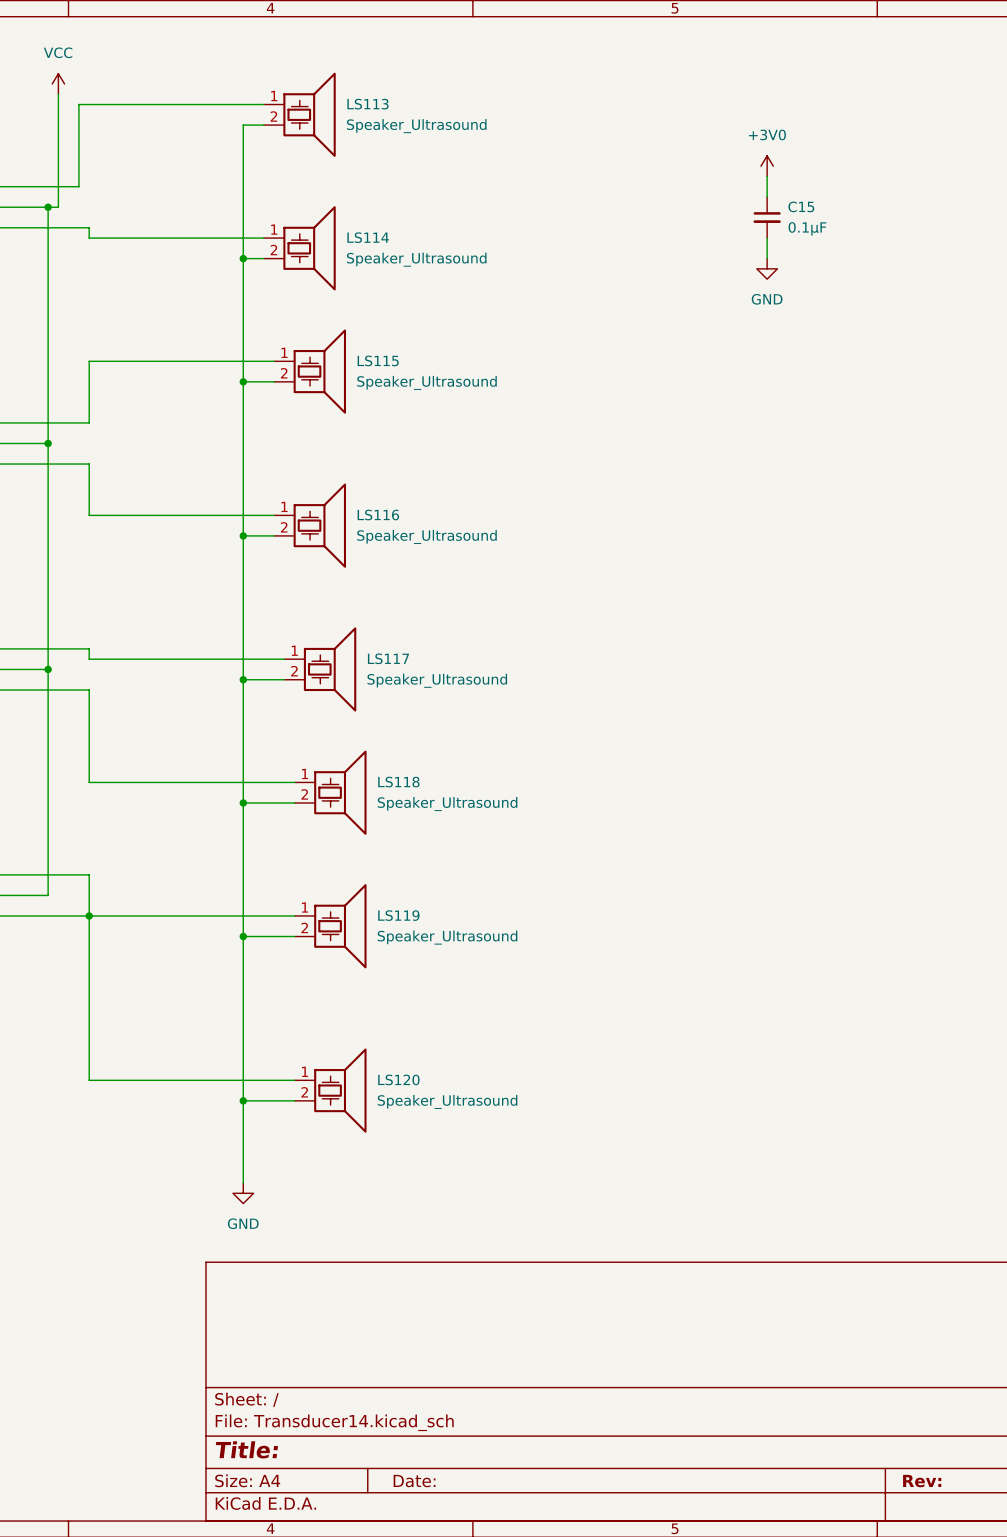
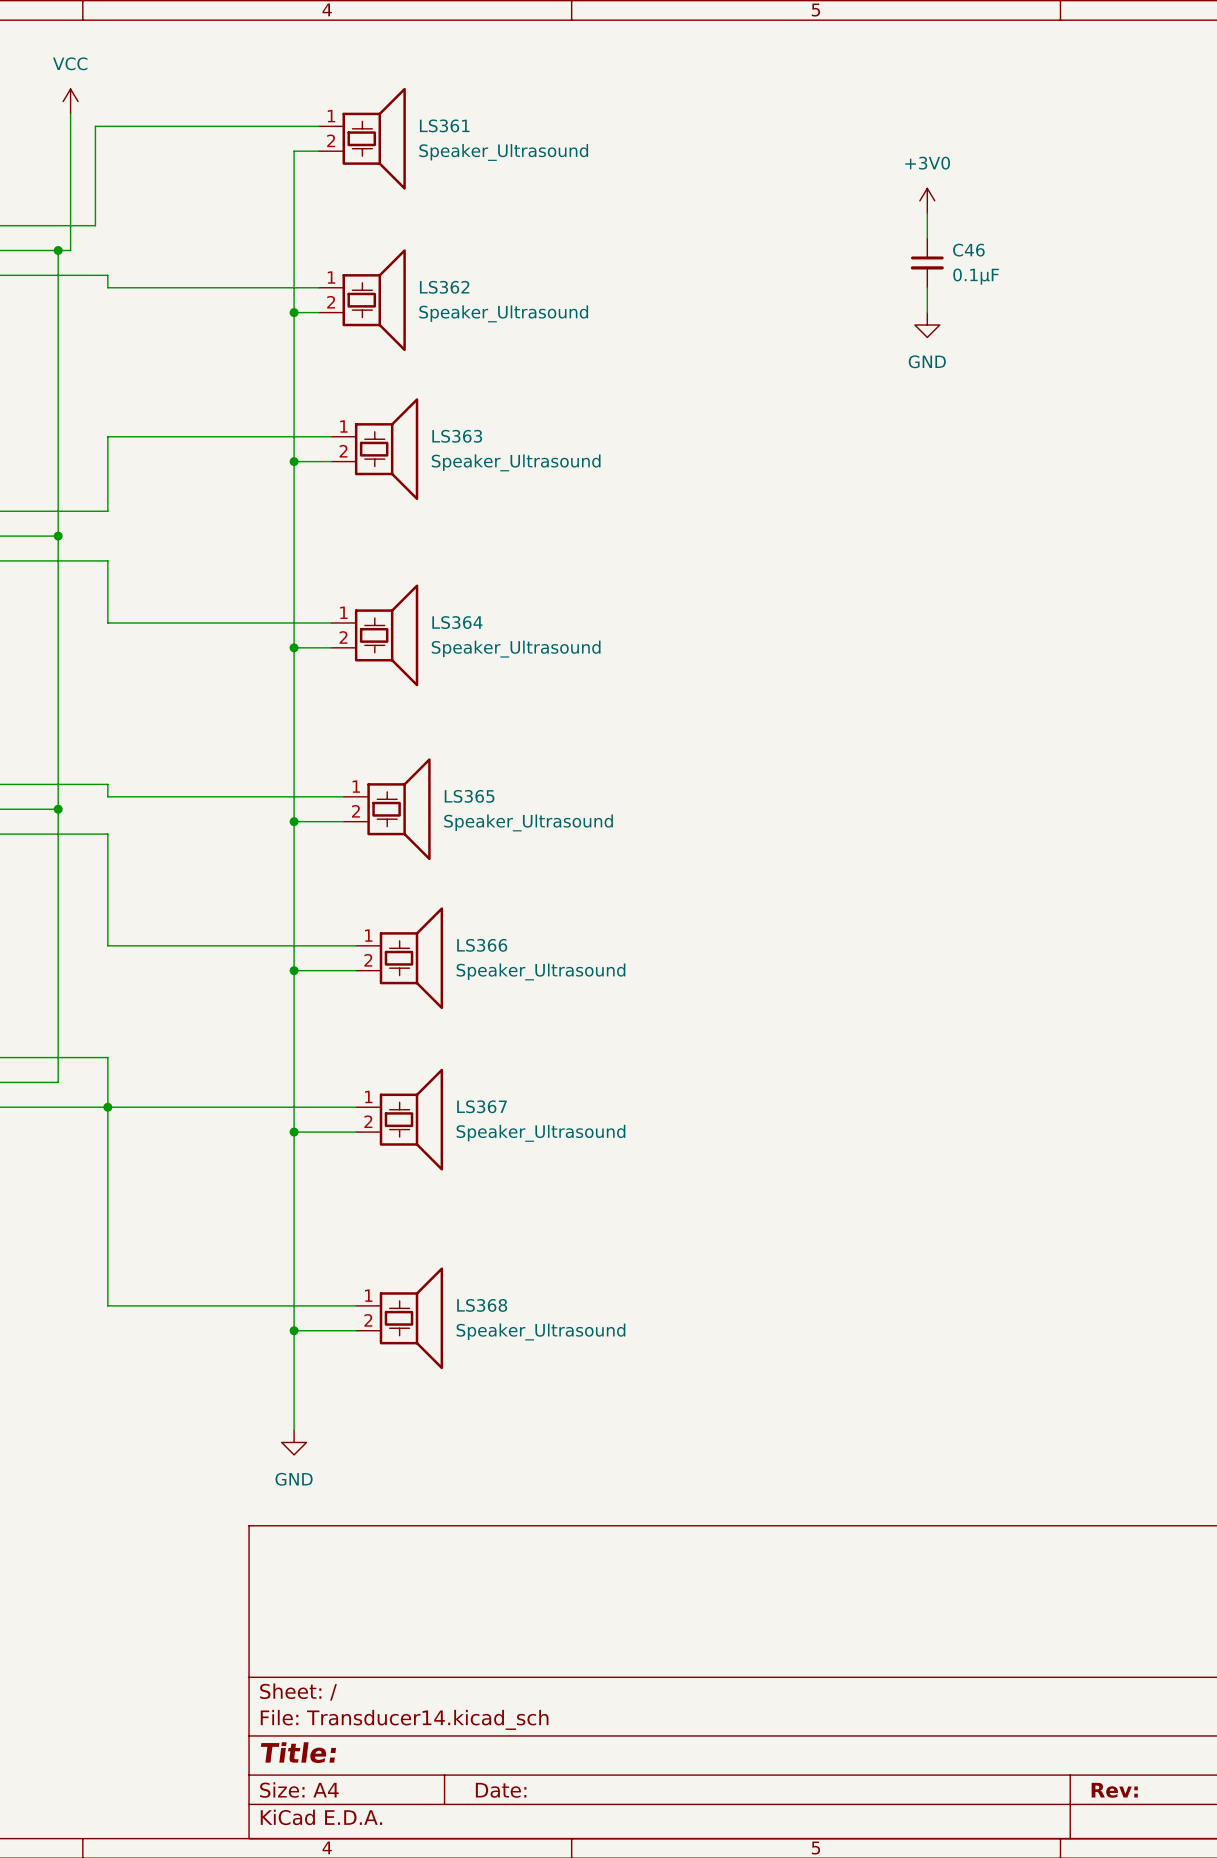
LS113 name: LS113 (367, 104) -> LS361 (444, 125)
C15 name: C15 (801, 206) -> C46 (968, 250)
LS114 name: LS114 (368, 237) -> LS362 (444, 287)
LS115 name: LS115 (378, 360) -> LS363 (457, 436)
LS116 name: LS116 (378, 515) -> LS364 (457, 622)
LS117 name: LS117 (388, 658) -> LS365 (469, 796)
LS118 name: LS118 (398, 782) -> LS366 (482, 945)
LS119 name: LS119 (398, 915) -> LS367 (482, 1106)
LS120 name: LS120 (398, 1079) -> LS368 (482, 1305)

